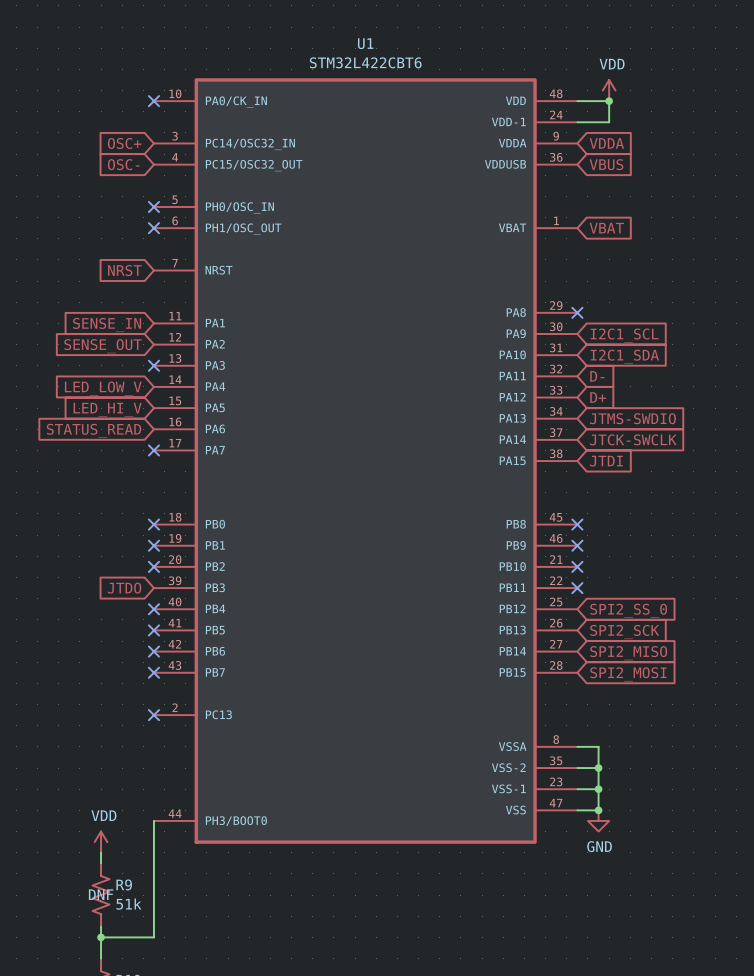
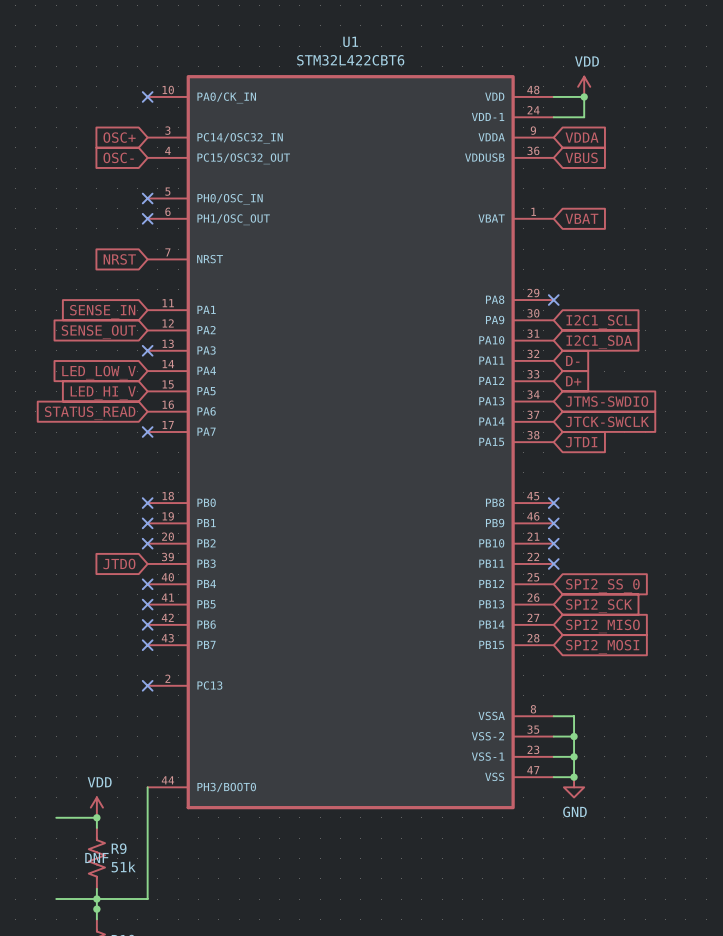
wire: none -> (56, 817) (96, 817)
junction: none -> (96, 817)
wire: none -> (56, 899) (96, 899)
junction: none -> (96, 909)

